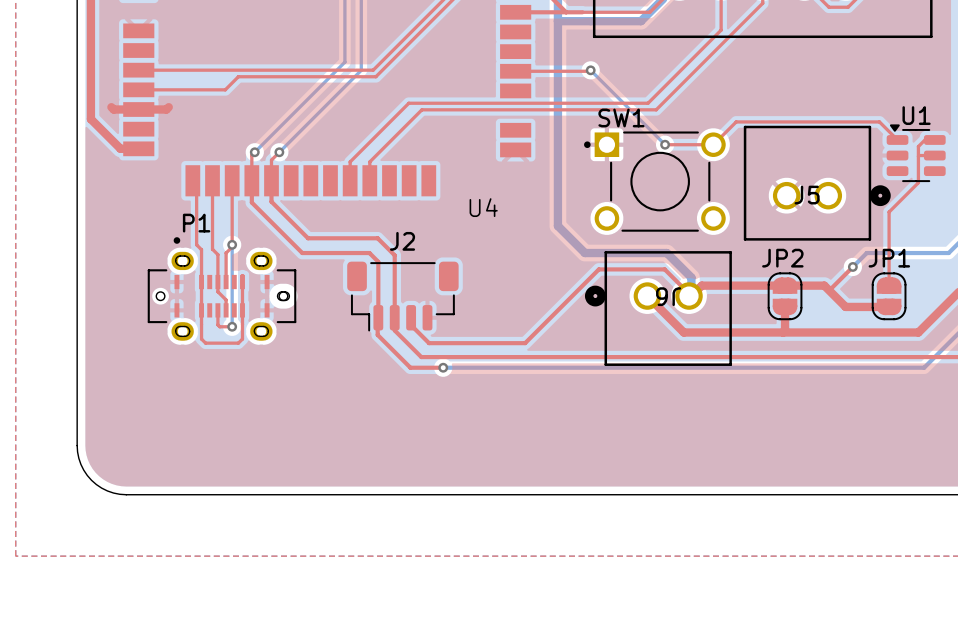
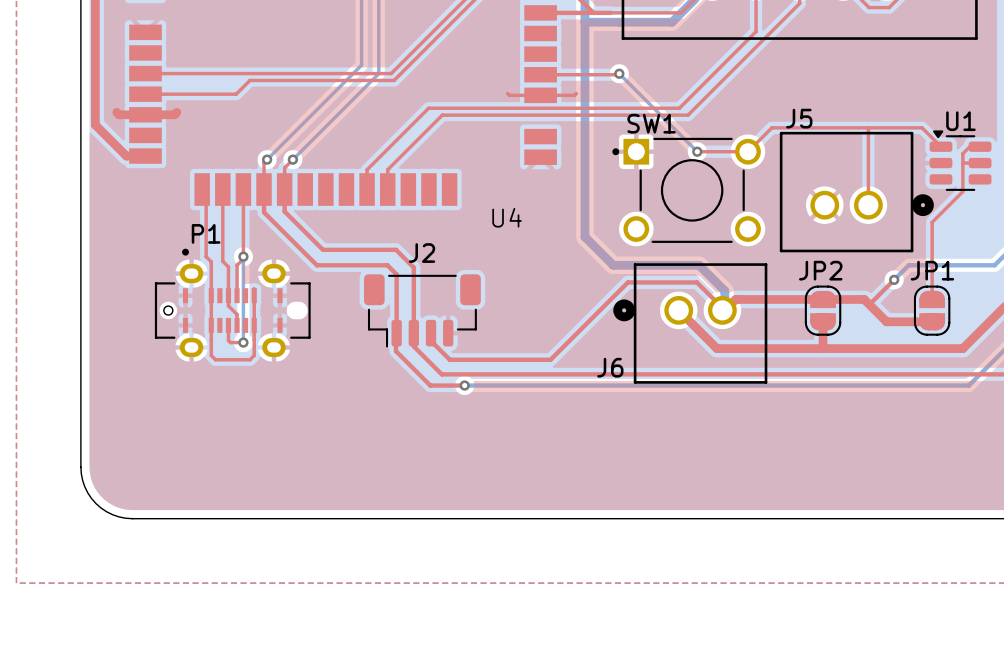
top track: none -> (507, 93) (509, 95) (574, 95) (576, 93)
top track: none -> (868, 127) (868, 205)
J5 name position: J5 (807, 195) -> J5 (799, 118)
P1 footprint: [147, 237, 297, 341] -> [154, 248, 311, 358]
J6 name rotation: 0° (668, 296) -> 180° (610, 367)
J6 name position: J6 (668, 296) -> J6 (610, 367)

